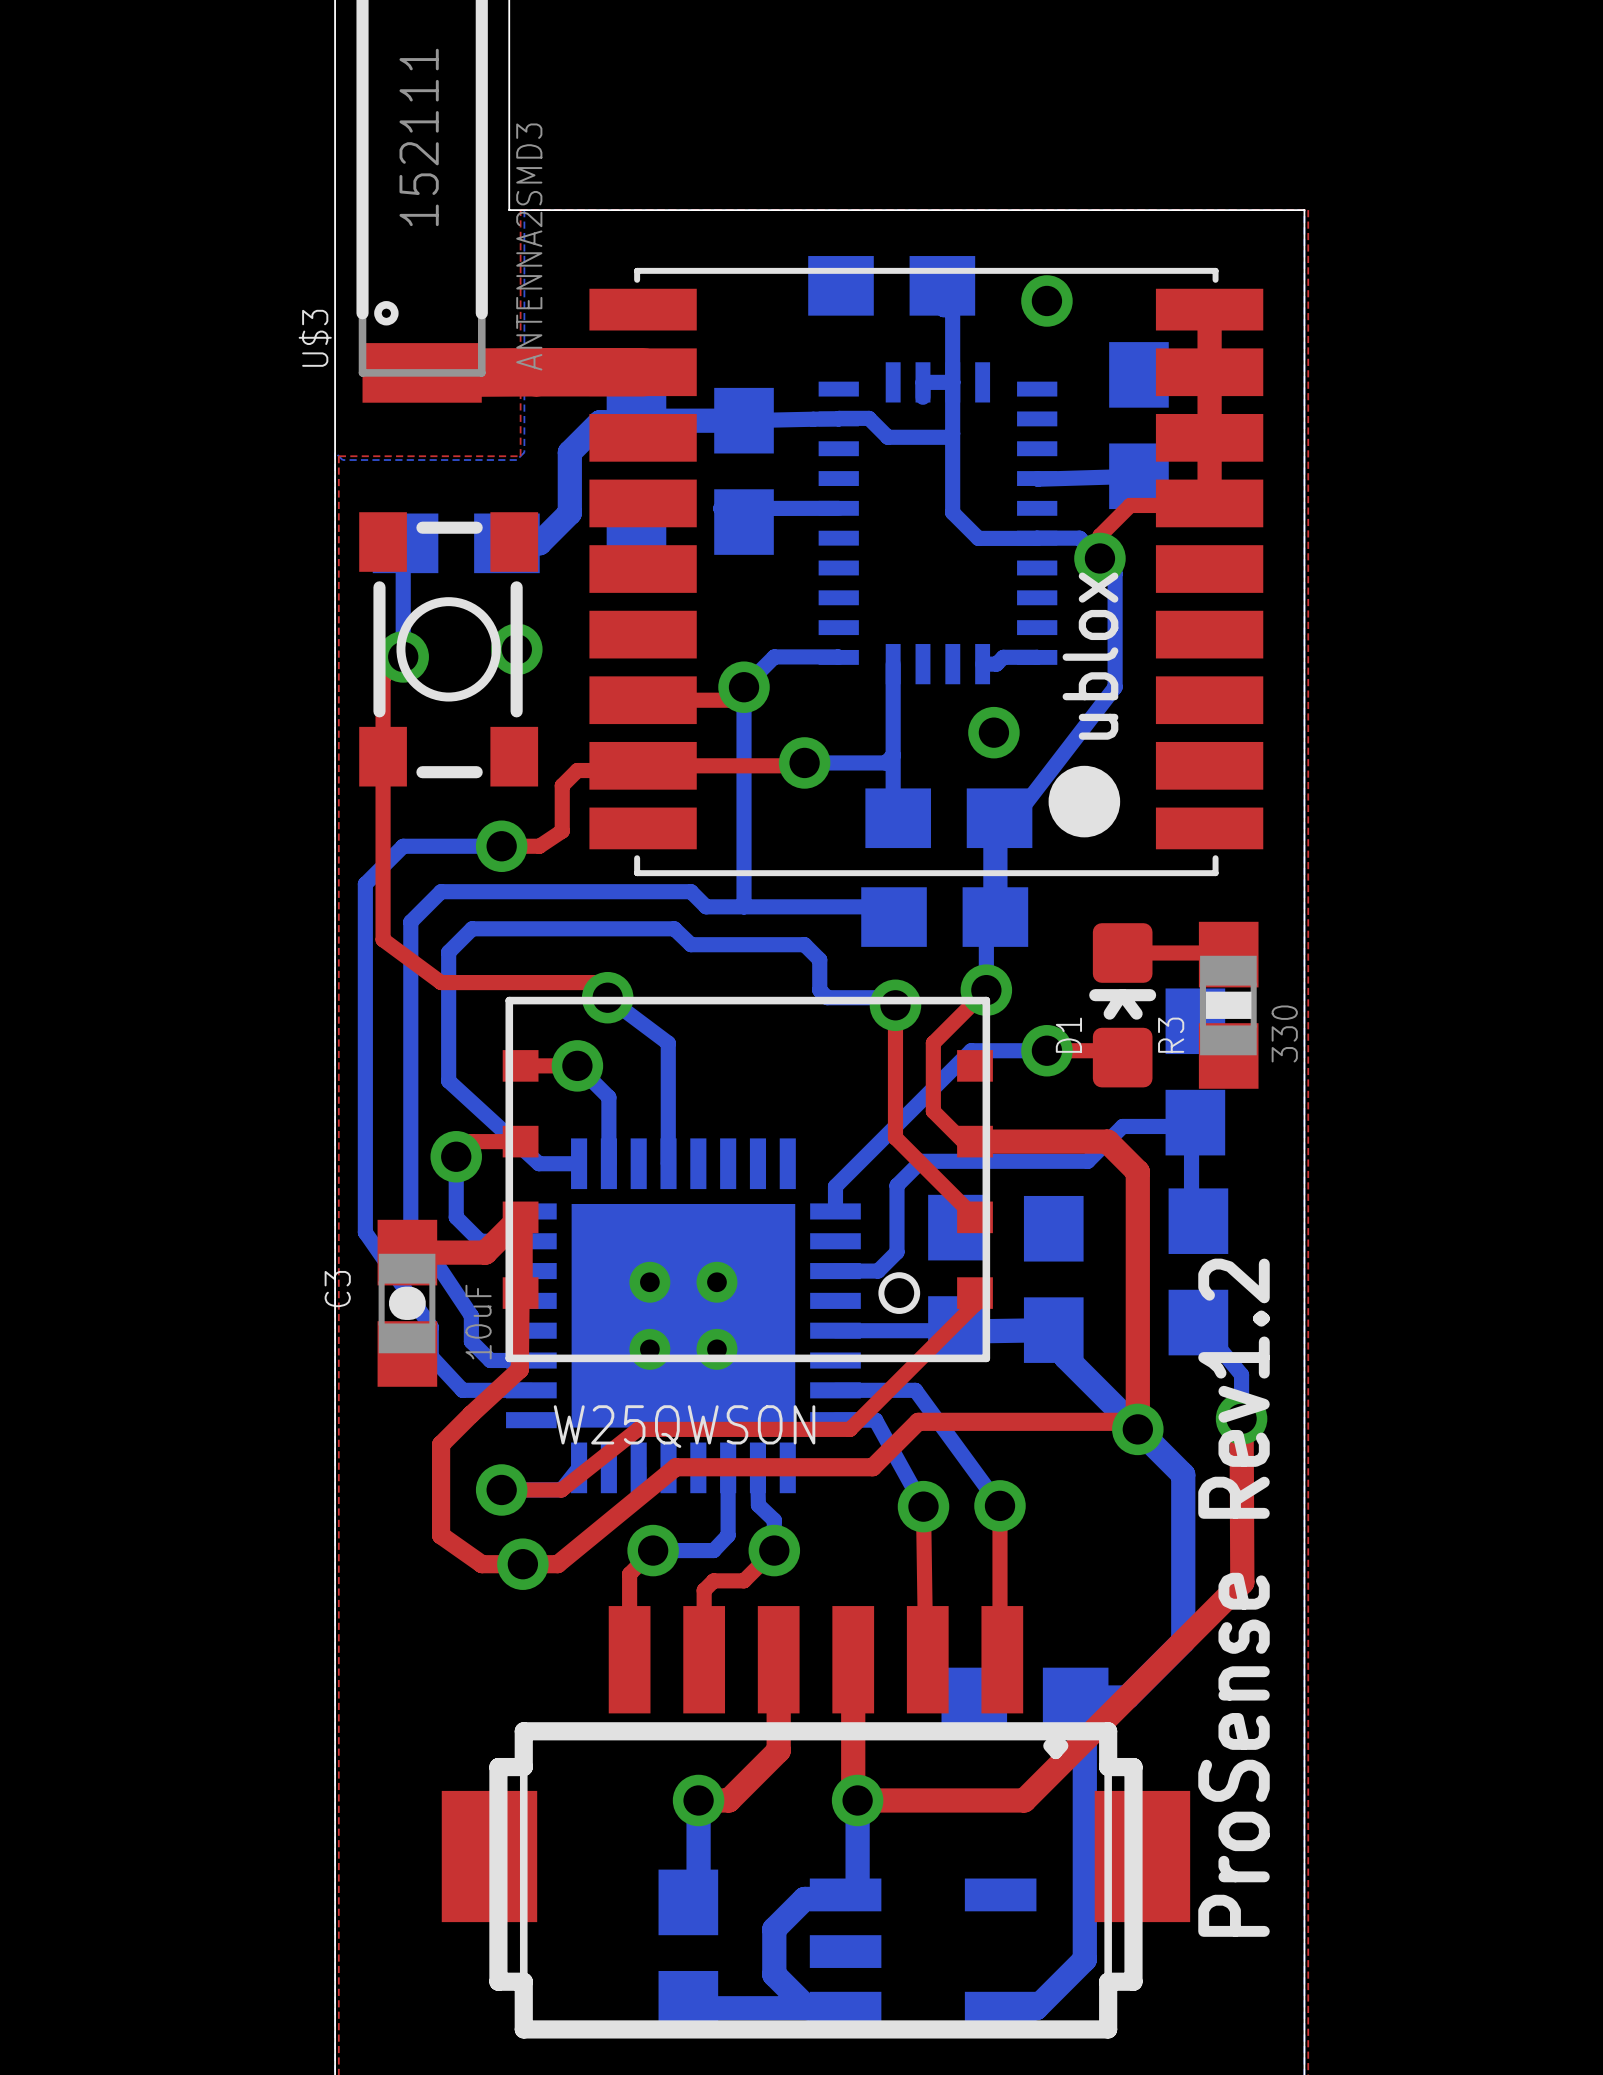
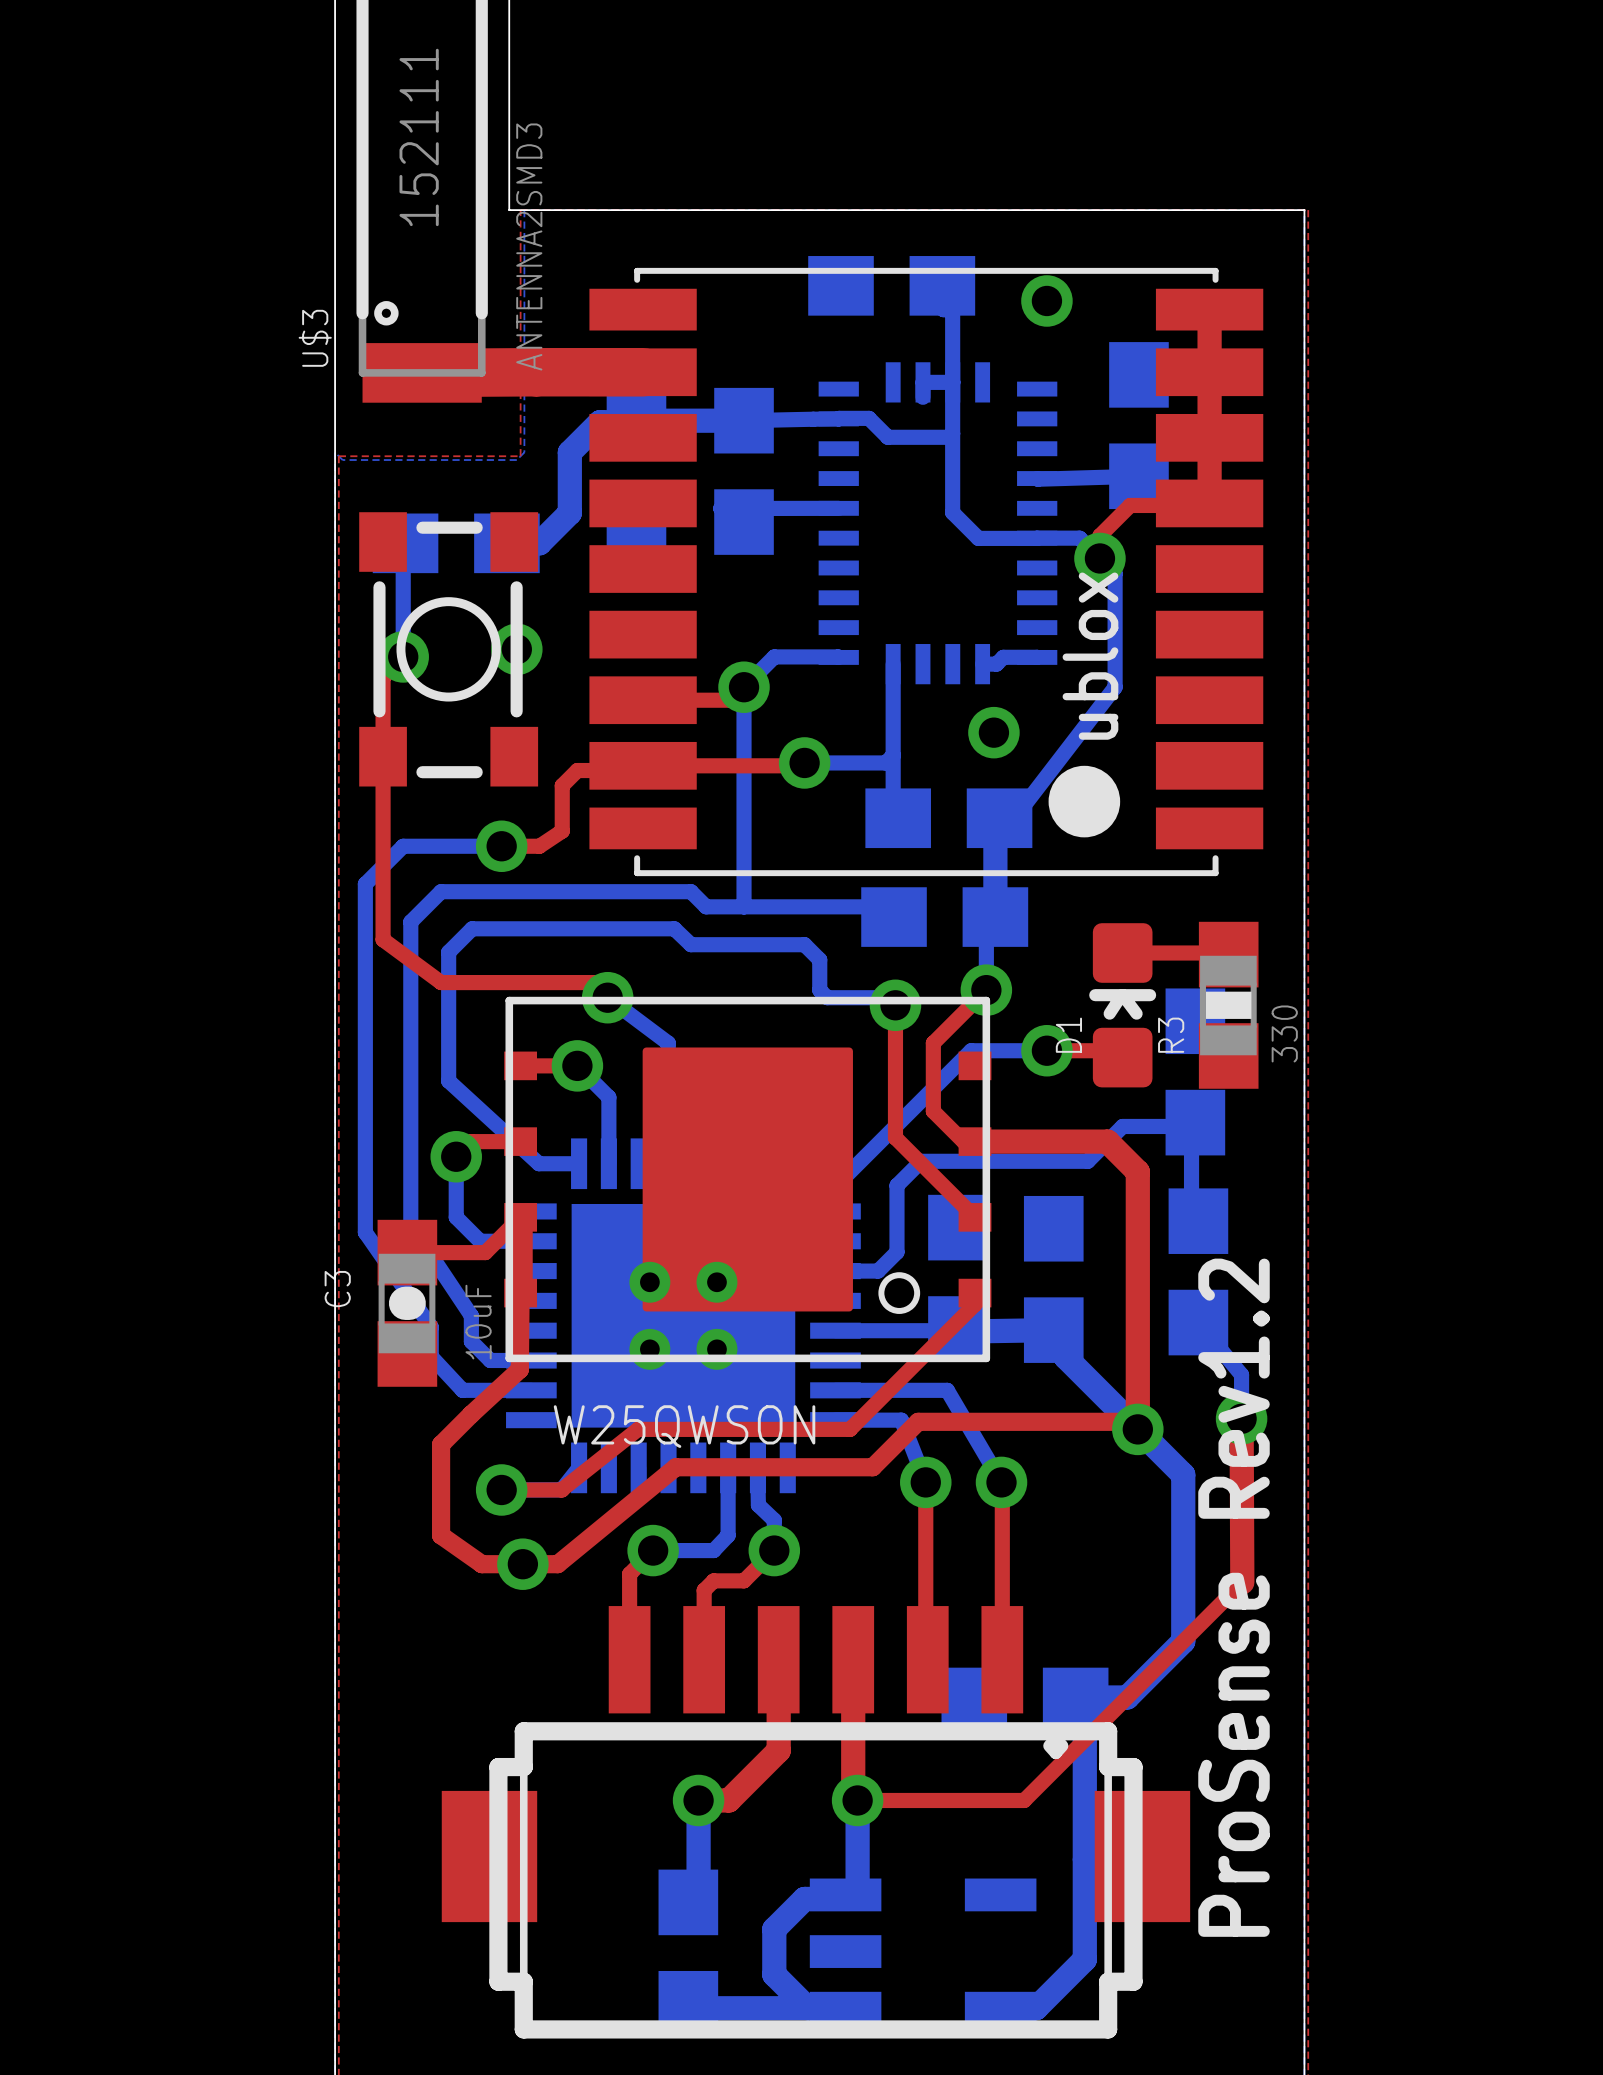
W25QWSON footprint: [502, 996, 993, 1363] -> [504, 996, 992, 1363]
top track width: thick (520, 1217) (485, 1252) (407, 1252) -> thin (520, 1217) (485, 1252) (407, 1252)
bottom track: (915, 1390) (999, 1505) -> (915, 1390) (947, 1390) (1001, 1482)
bottom track: (875, 1420) (923, 1506) -> (875, 1420) (901, 1420) (925, 1482)
top track: (999, 1505) (999, 1657) (1002, 1659) -> (1002, 1483) (1002, 1659)
via position: (999, 1505) -> (1001, 1482)
top track: (923, 1506) (925, 1657) -> (925, 1482) (925, 1657)
via position: (923, 1506) -> (925, 1482)
top track width: thick (1242, 1582) (1024, 1800) (857, 1800) -> thin (1242, 1582) (1024, 1800) (857, 1800)

